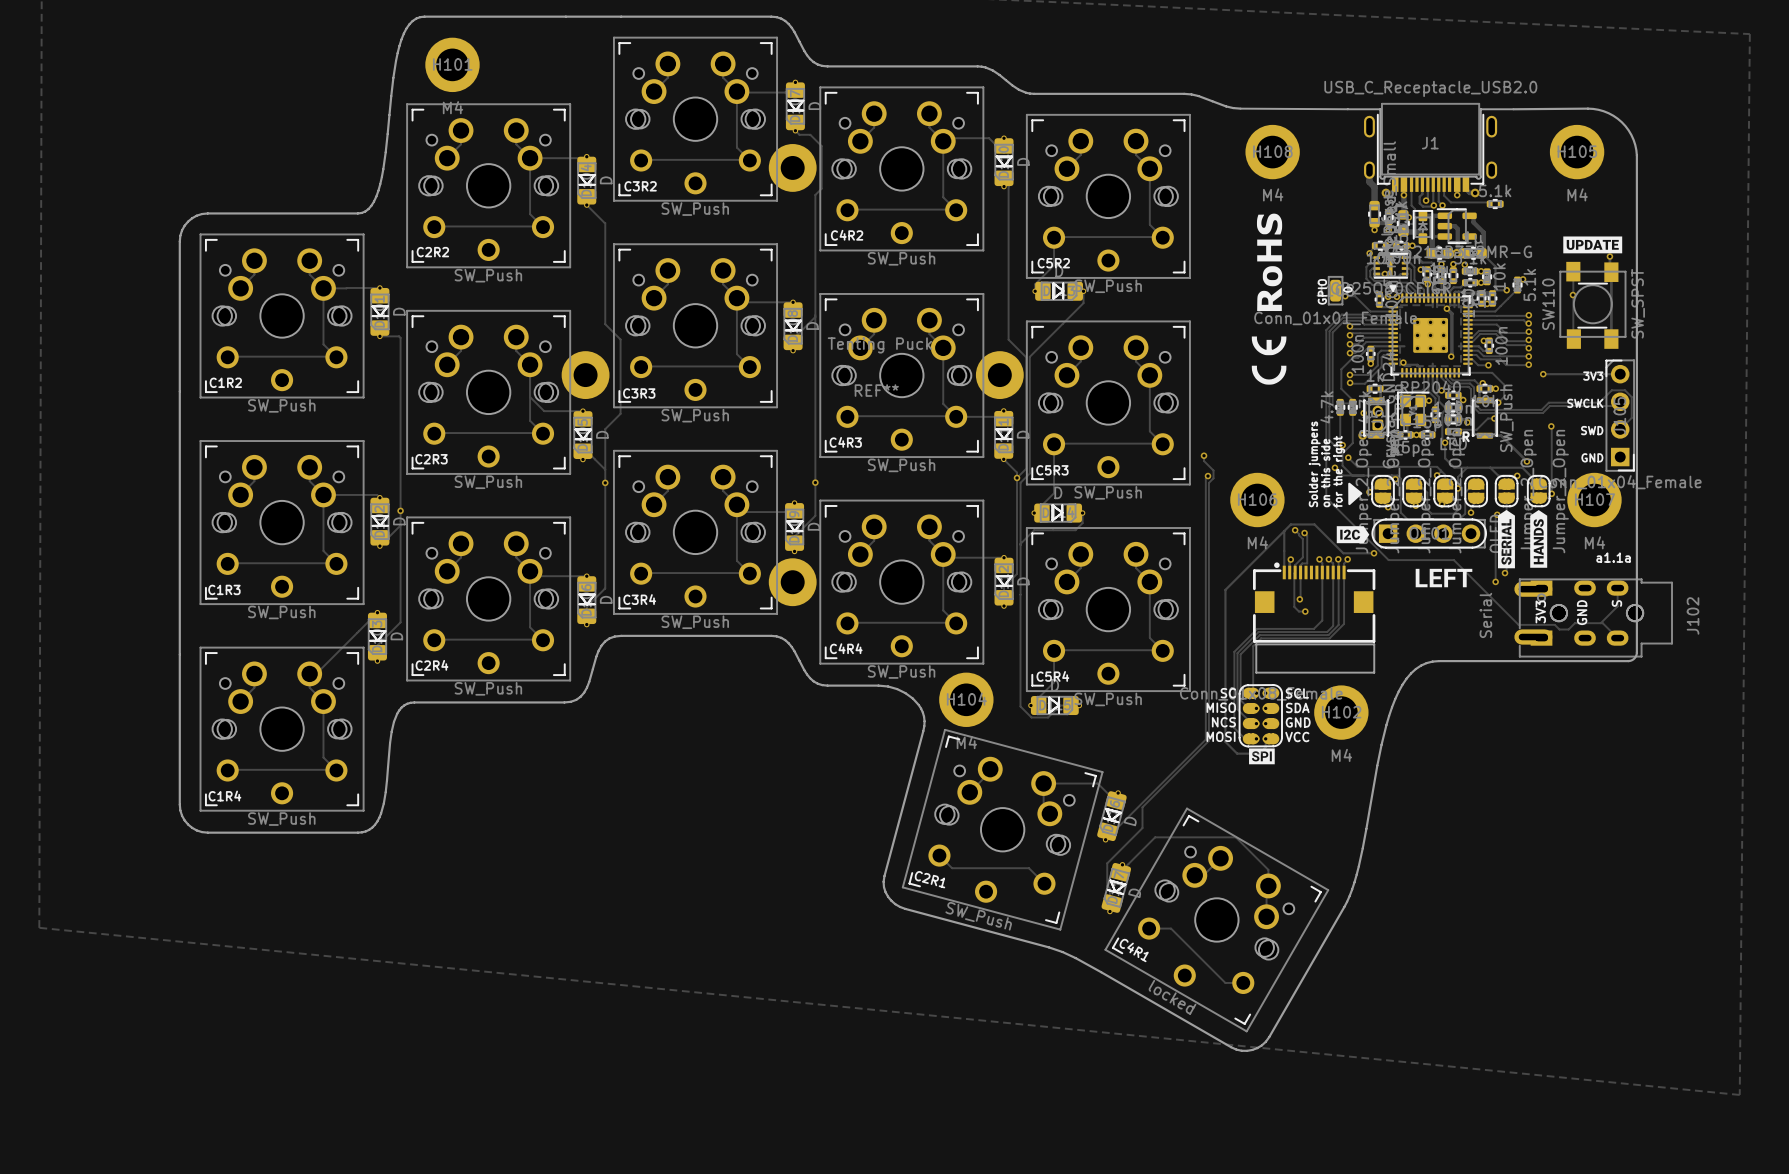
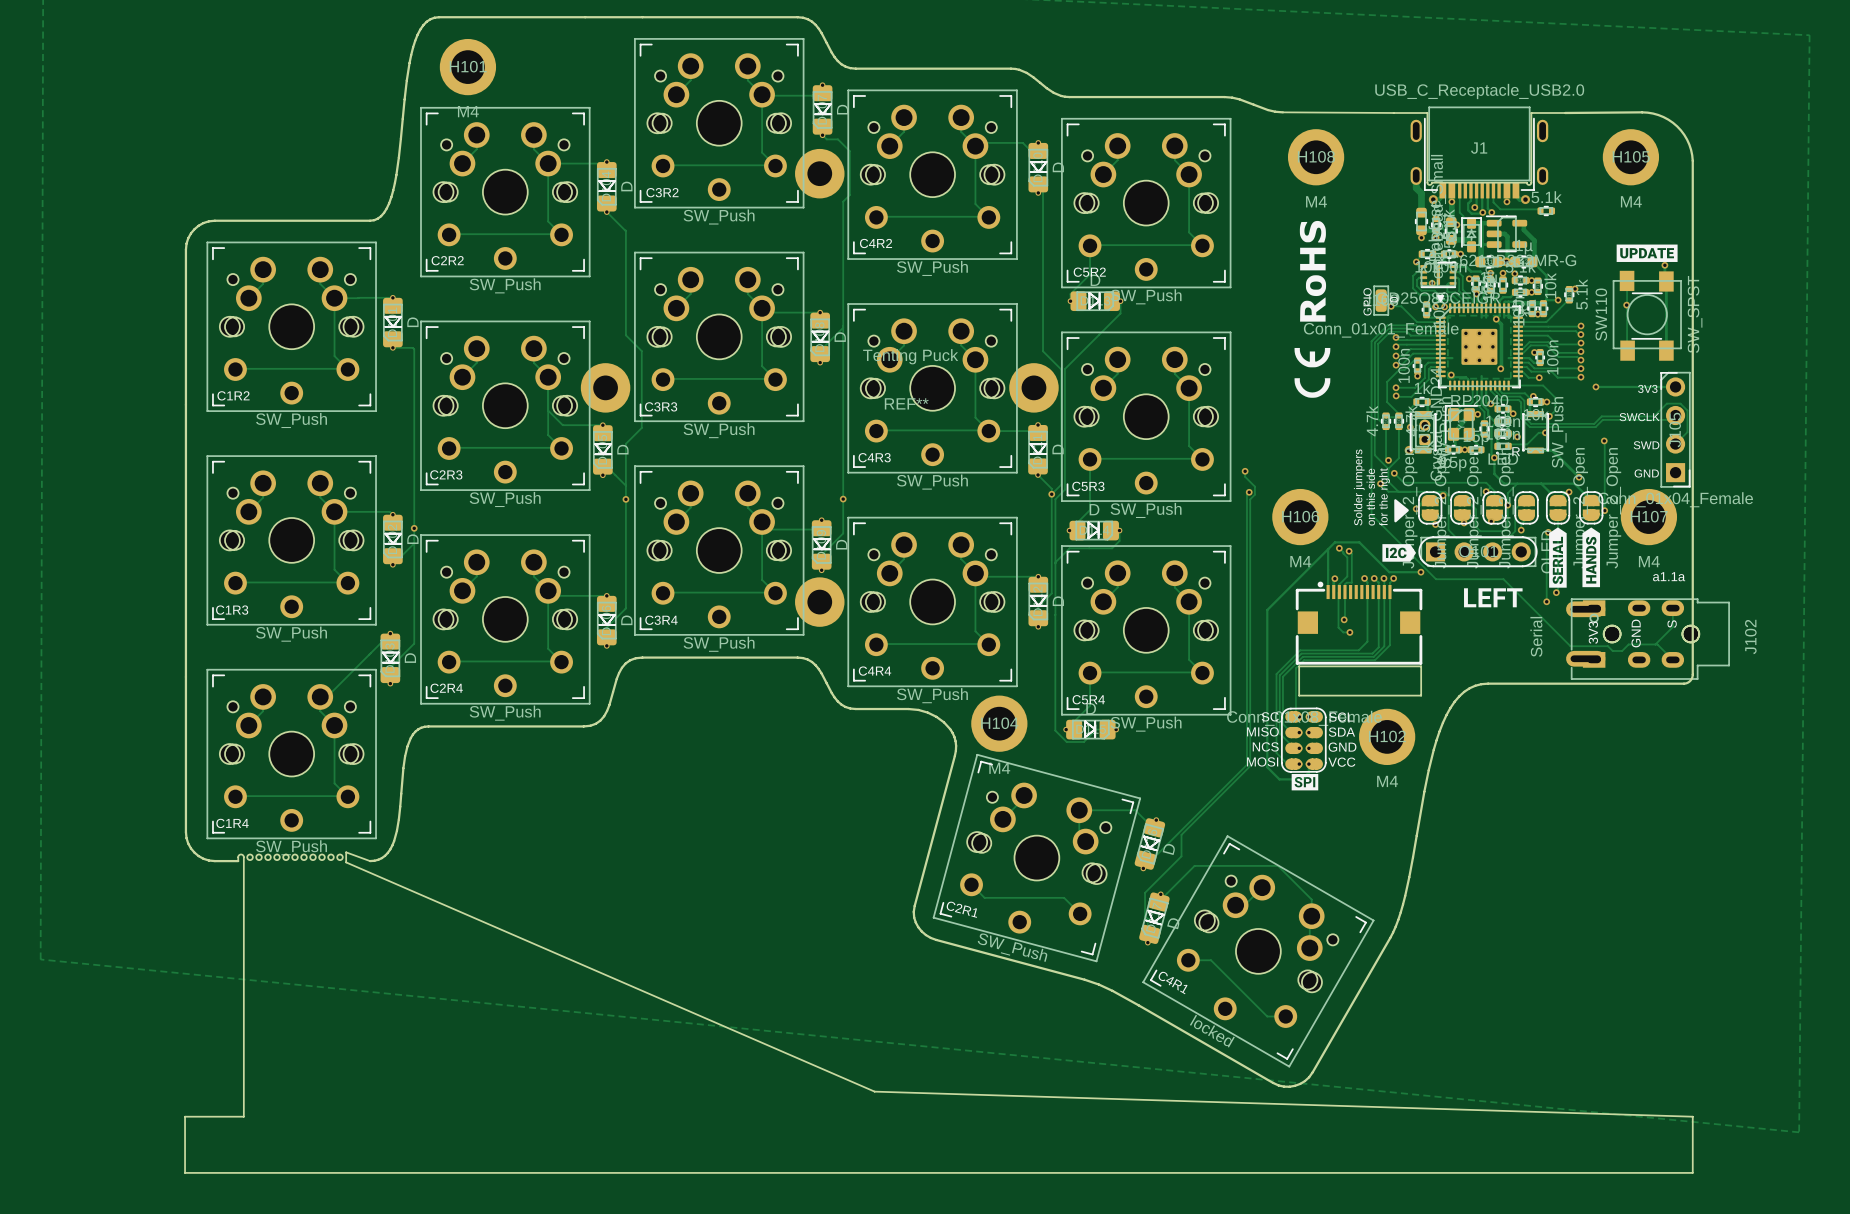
round board edge: none -> [246, 854, 254, 861]
round board edge: none -> [255, 854, 263, 861]
round board edge: none -> [264, 854, 272, 861]
round board edge: none -> [273, 854, 281, 861]
round board edge: none -> [282, 854, 290, 861]
round board edge: none -> [291, 854, 299, 861]
round board edge: none -> [300, 854, 308, 861]
round board edge: none -> [309, 854, 317, 861]
round board edge: none -> [318, 854, 326, 861]
round board edge: none -> [327, 854, 335, 861]
round board edge: none -> [336, 854, 344, 861]
board edge: (230, 832) (357, 832) -> (238, 861) (238, 855) (242, 854) (243, 1116) (185, 1116) (185, 1172) (1692, 1172)
board edge: none -> (370, 861) (346, 852) (346, 862) (874, 1091) (1692, 1116) (1692, 1172)

